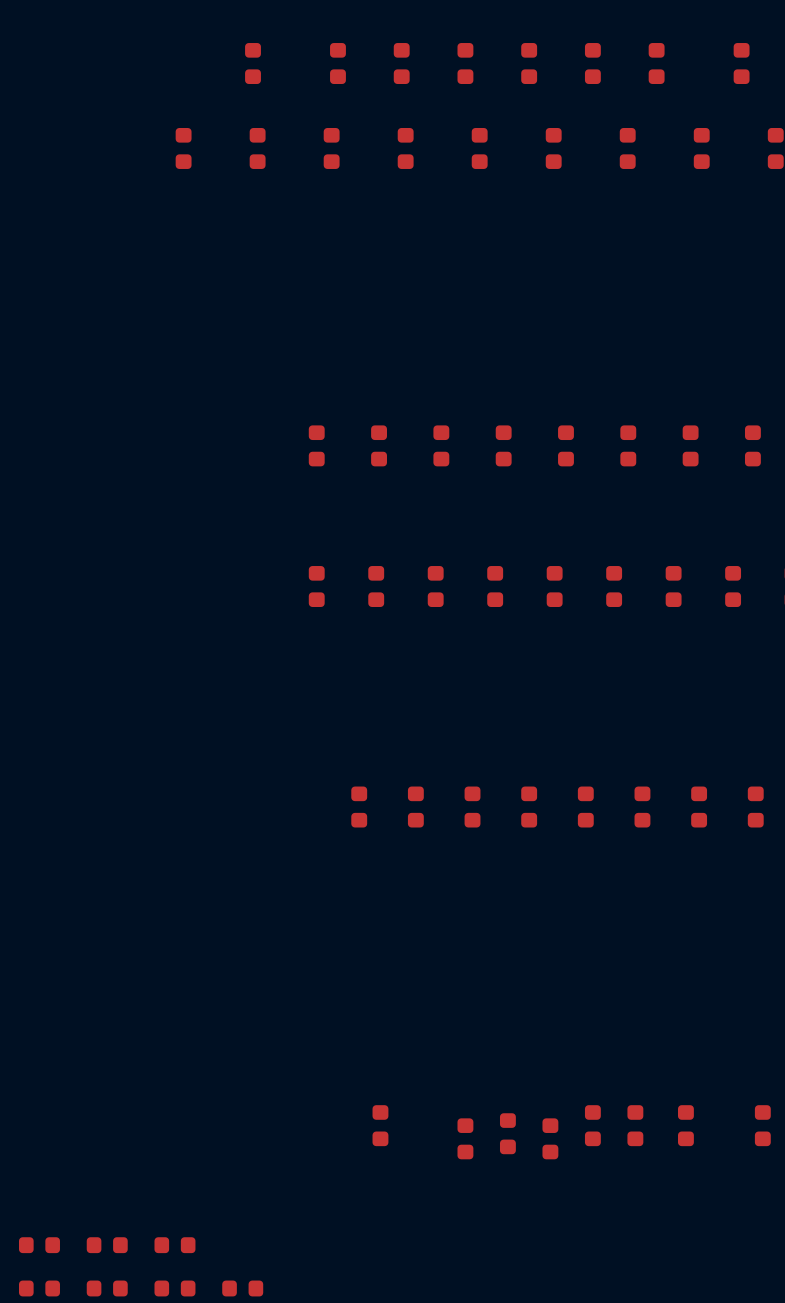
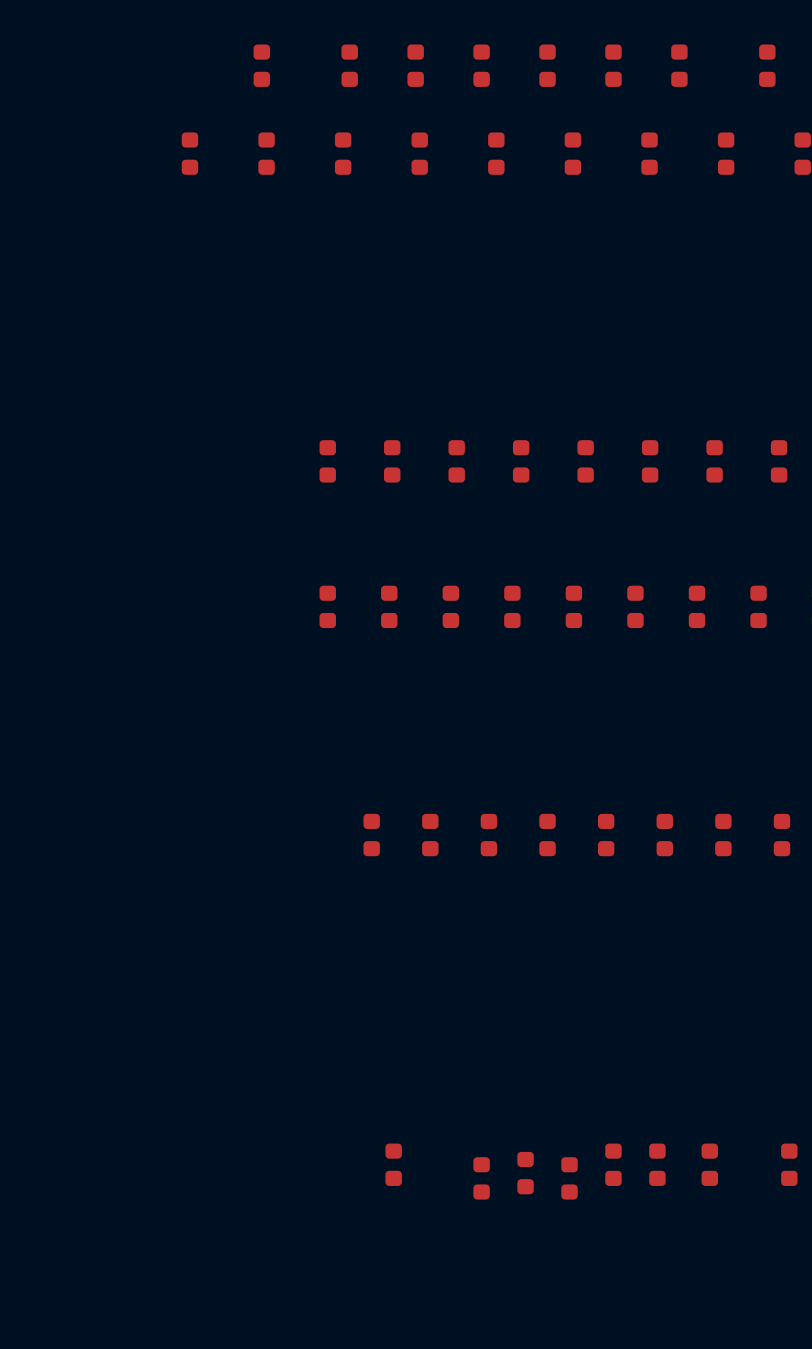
part: (39, 1245) -> none
part: (107, 1245) -> none
part: (174, 1245) -> none
part: (39, 1288) -> none
part: (107, 1288) -> none
part: (174, 1288) -> none
part: (242, 1288) -> none

